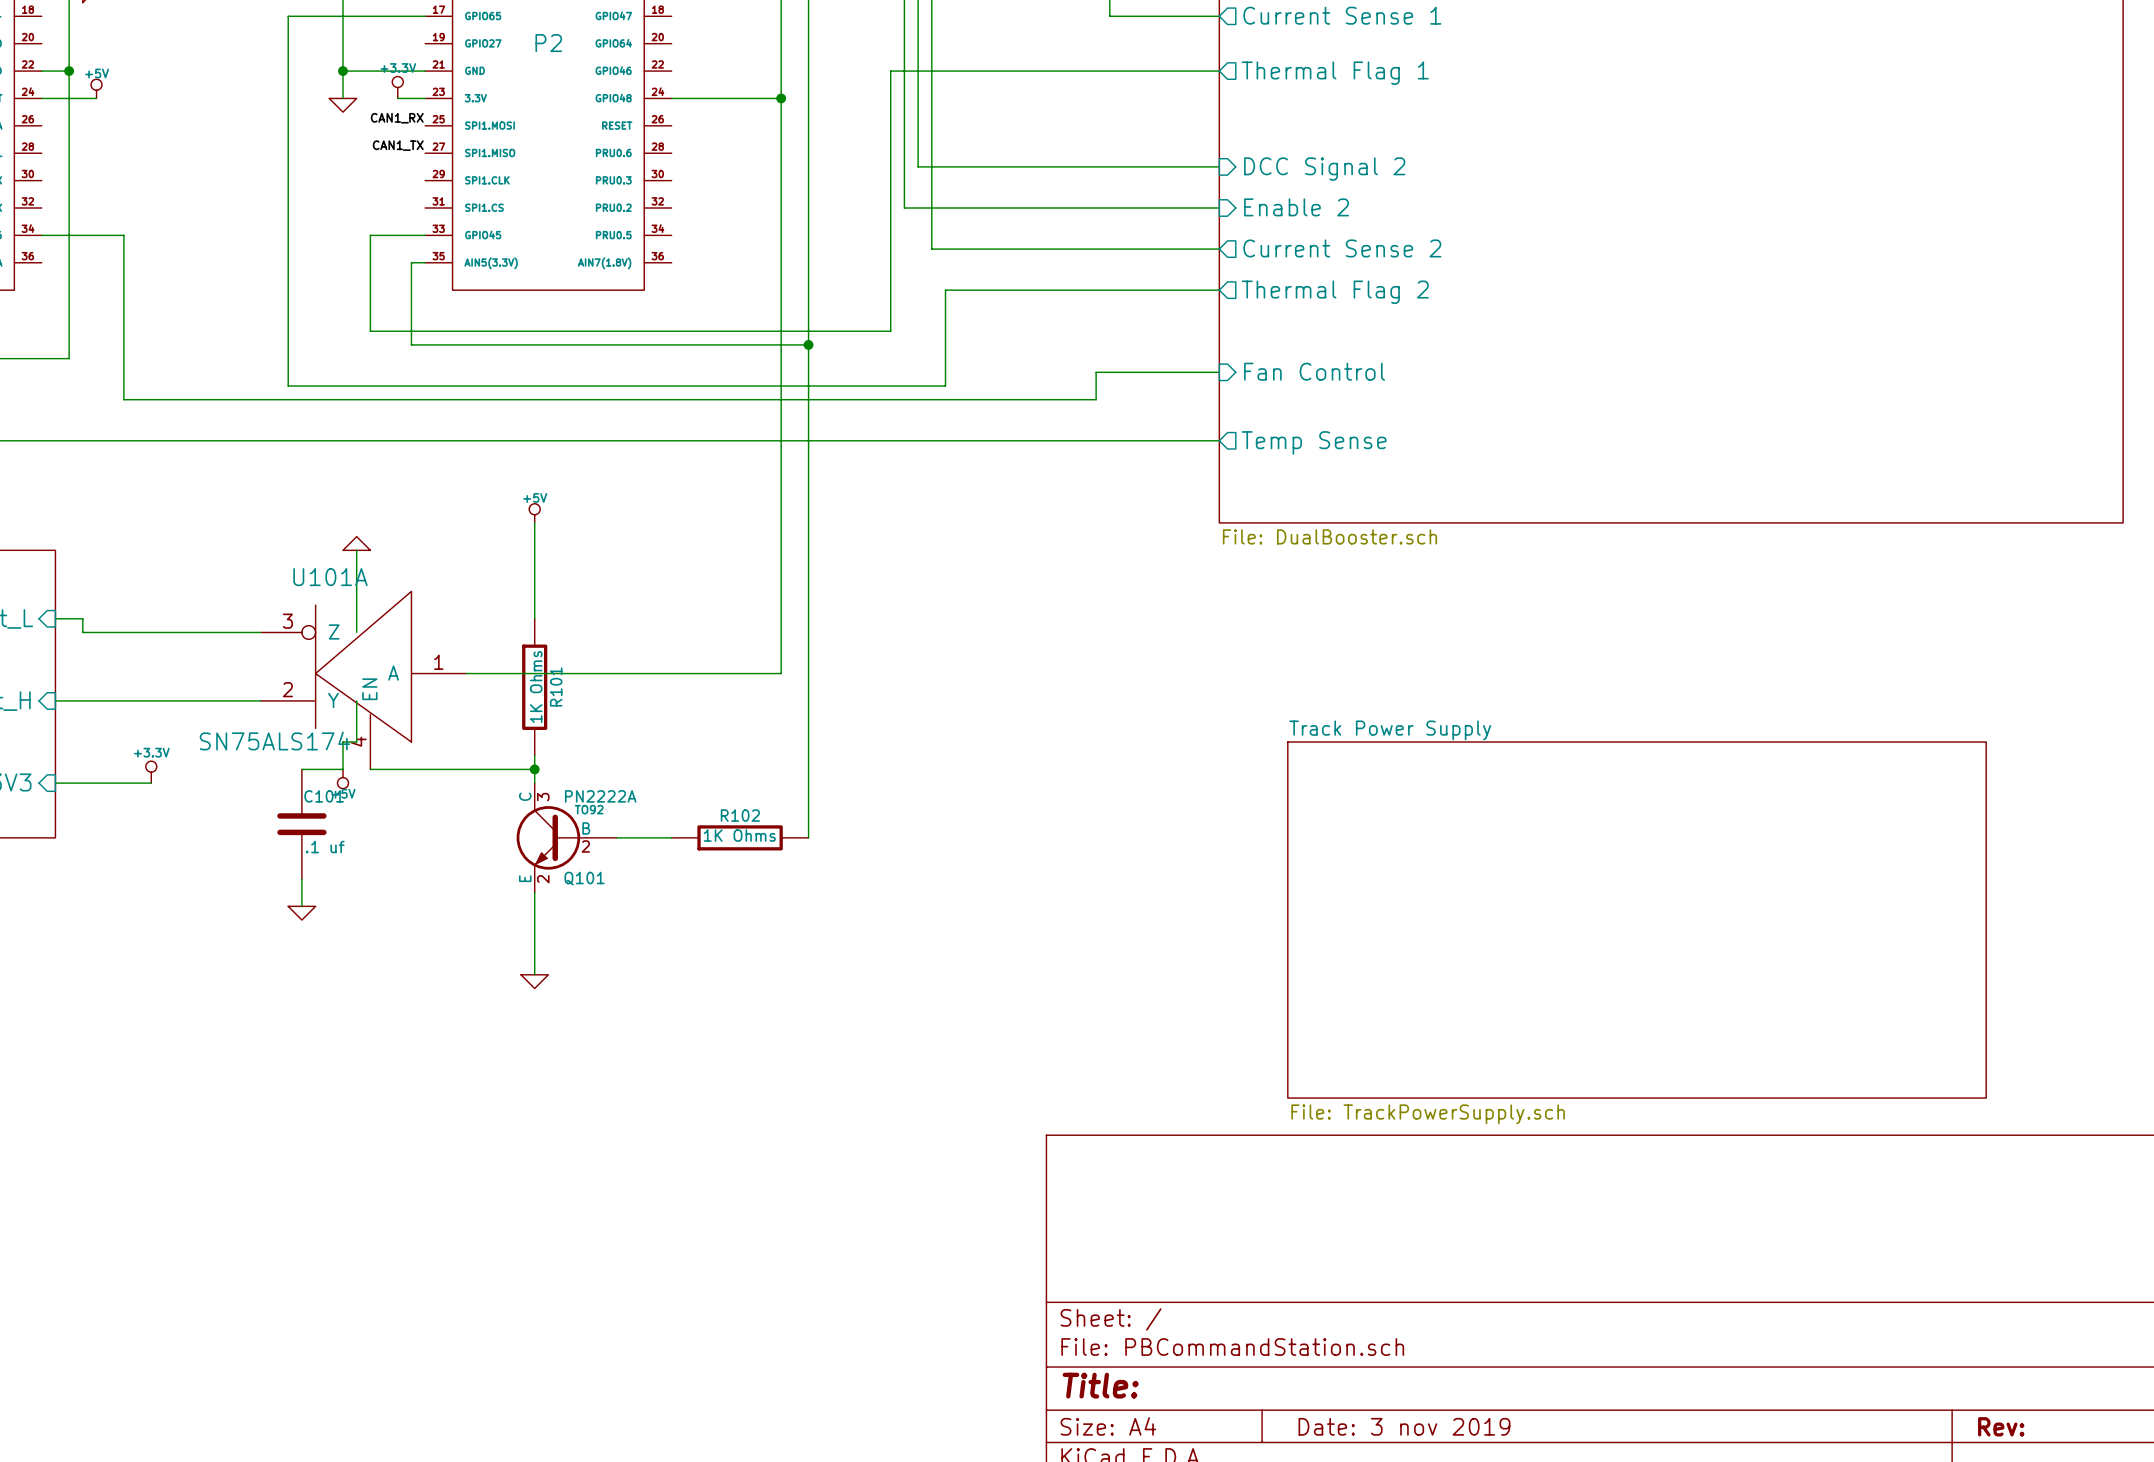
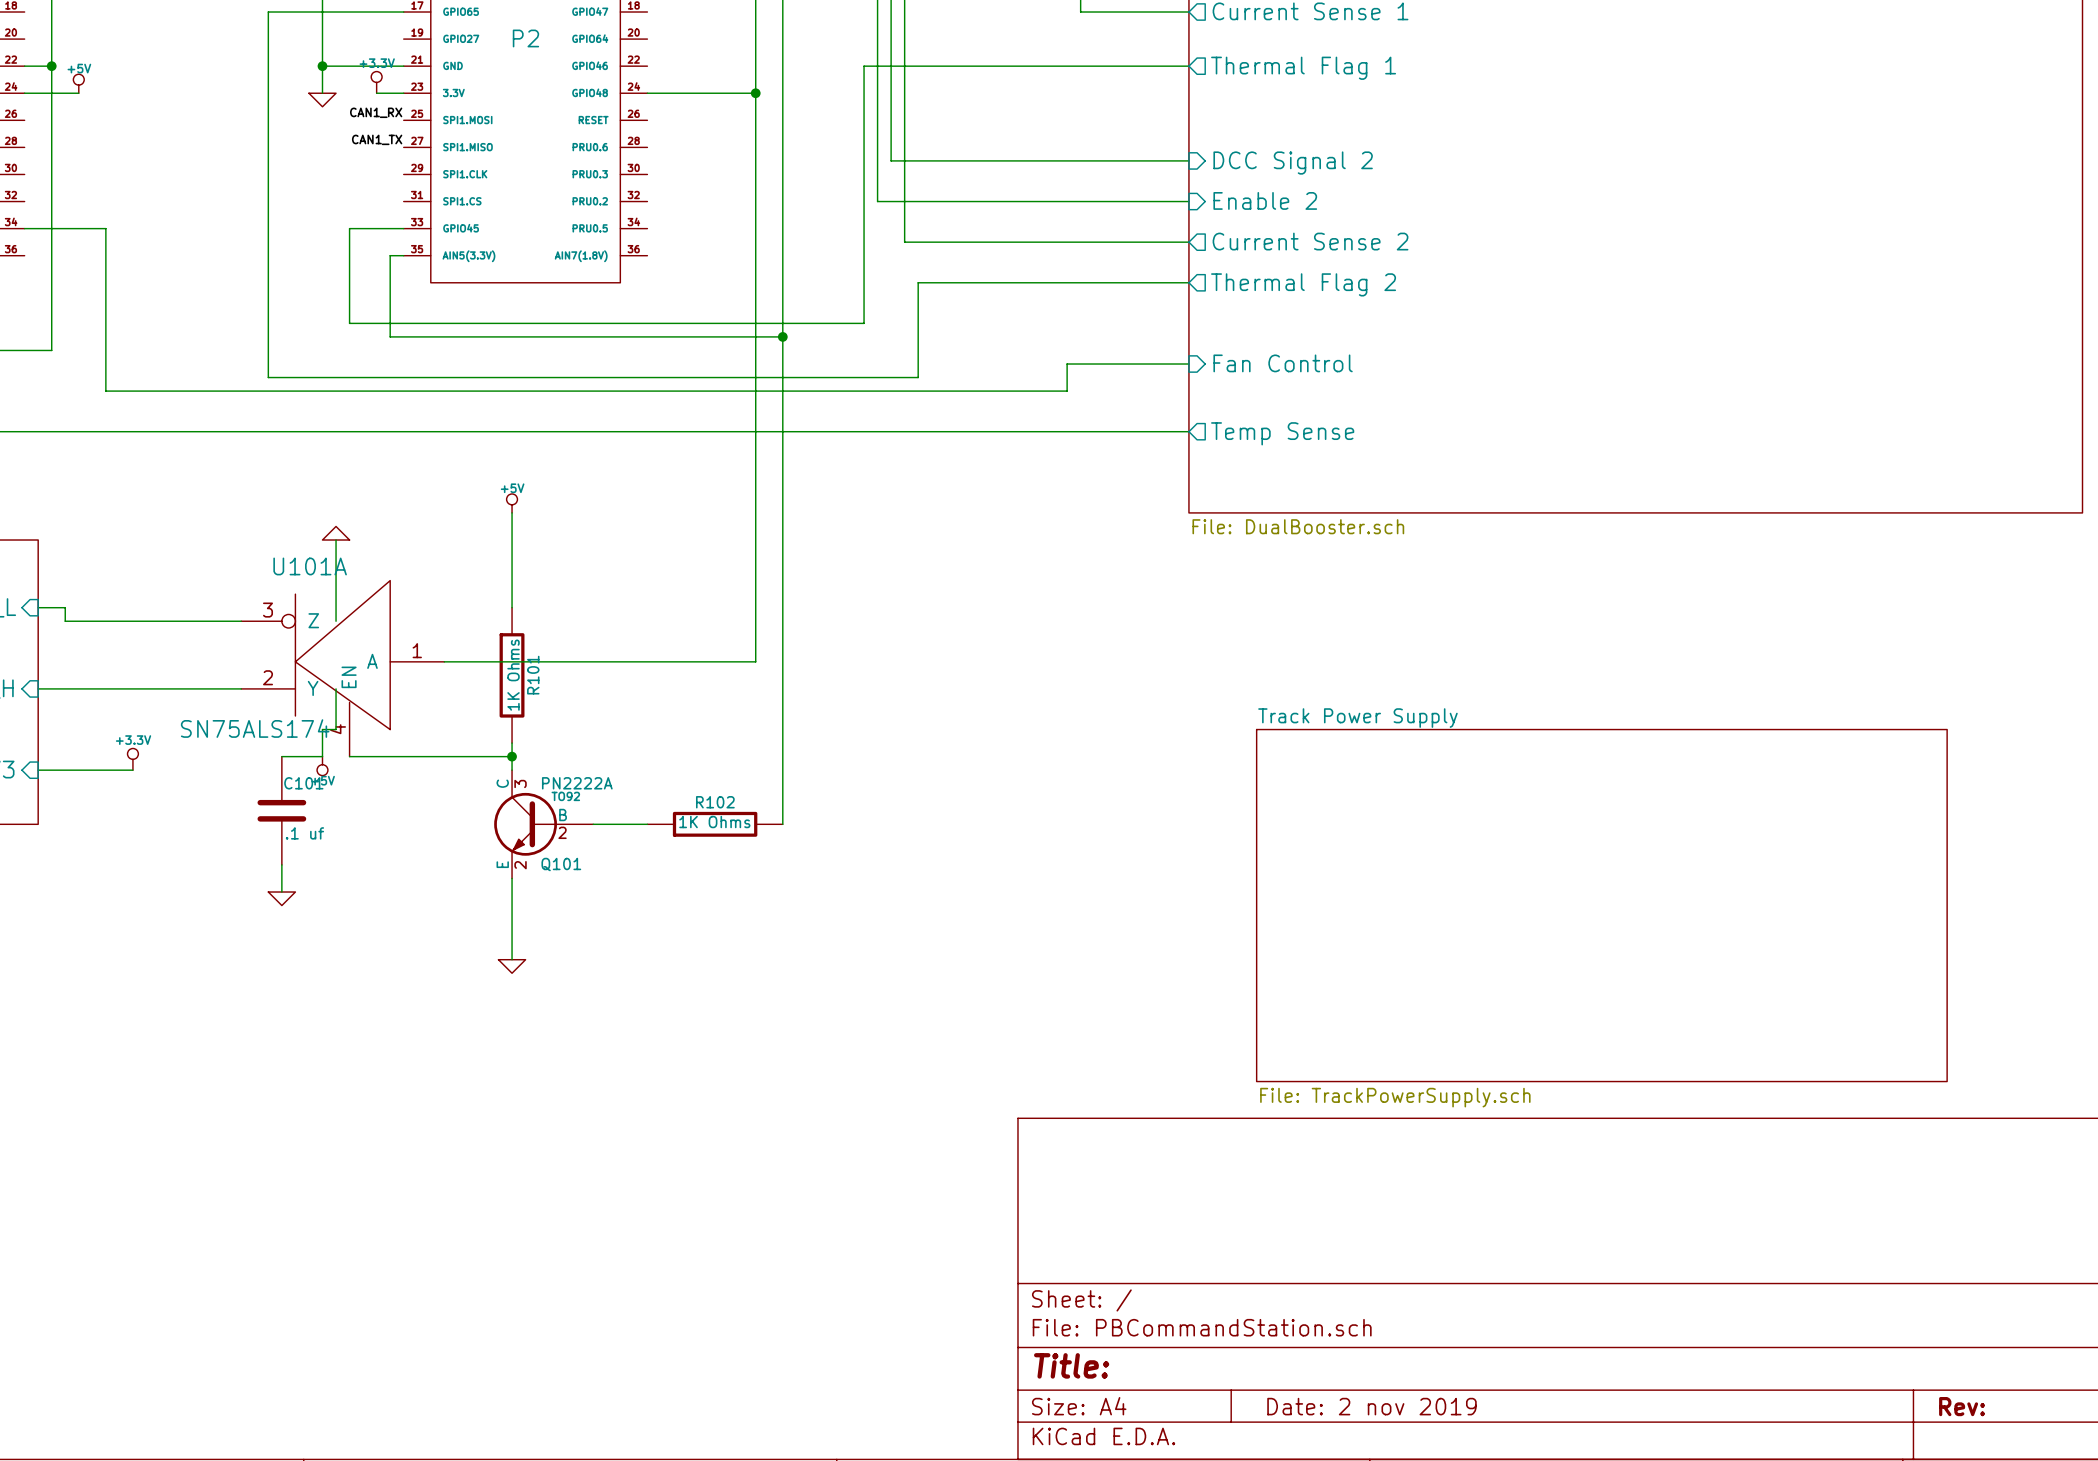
title block: Date: 3 nov 2019 (1404, 1426) -> Date: 2 nov 2019 (1371, 1406)

